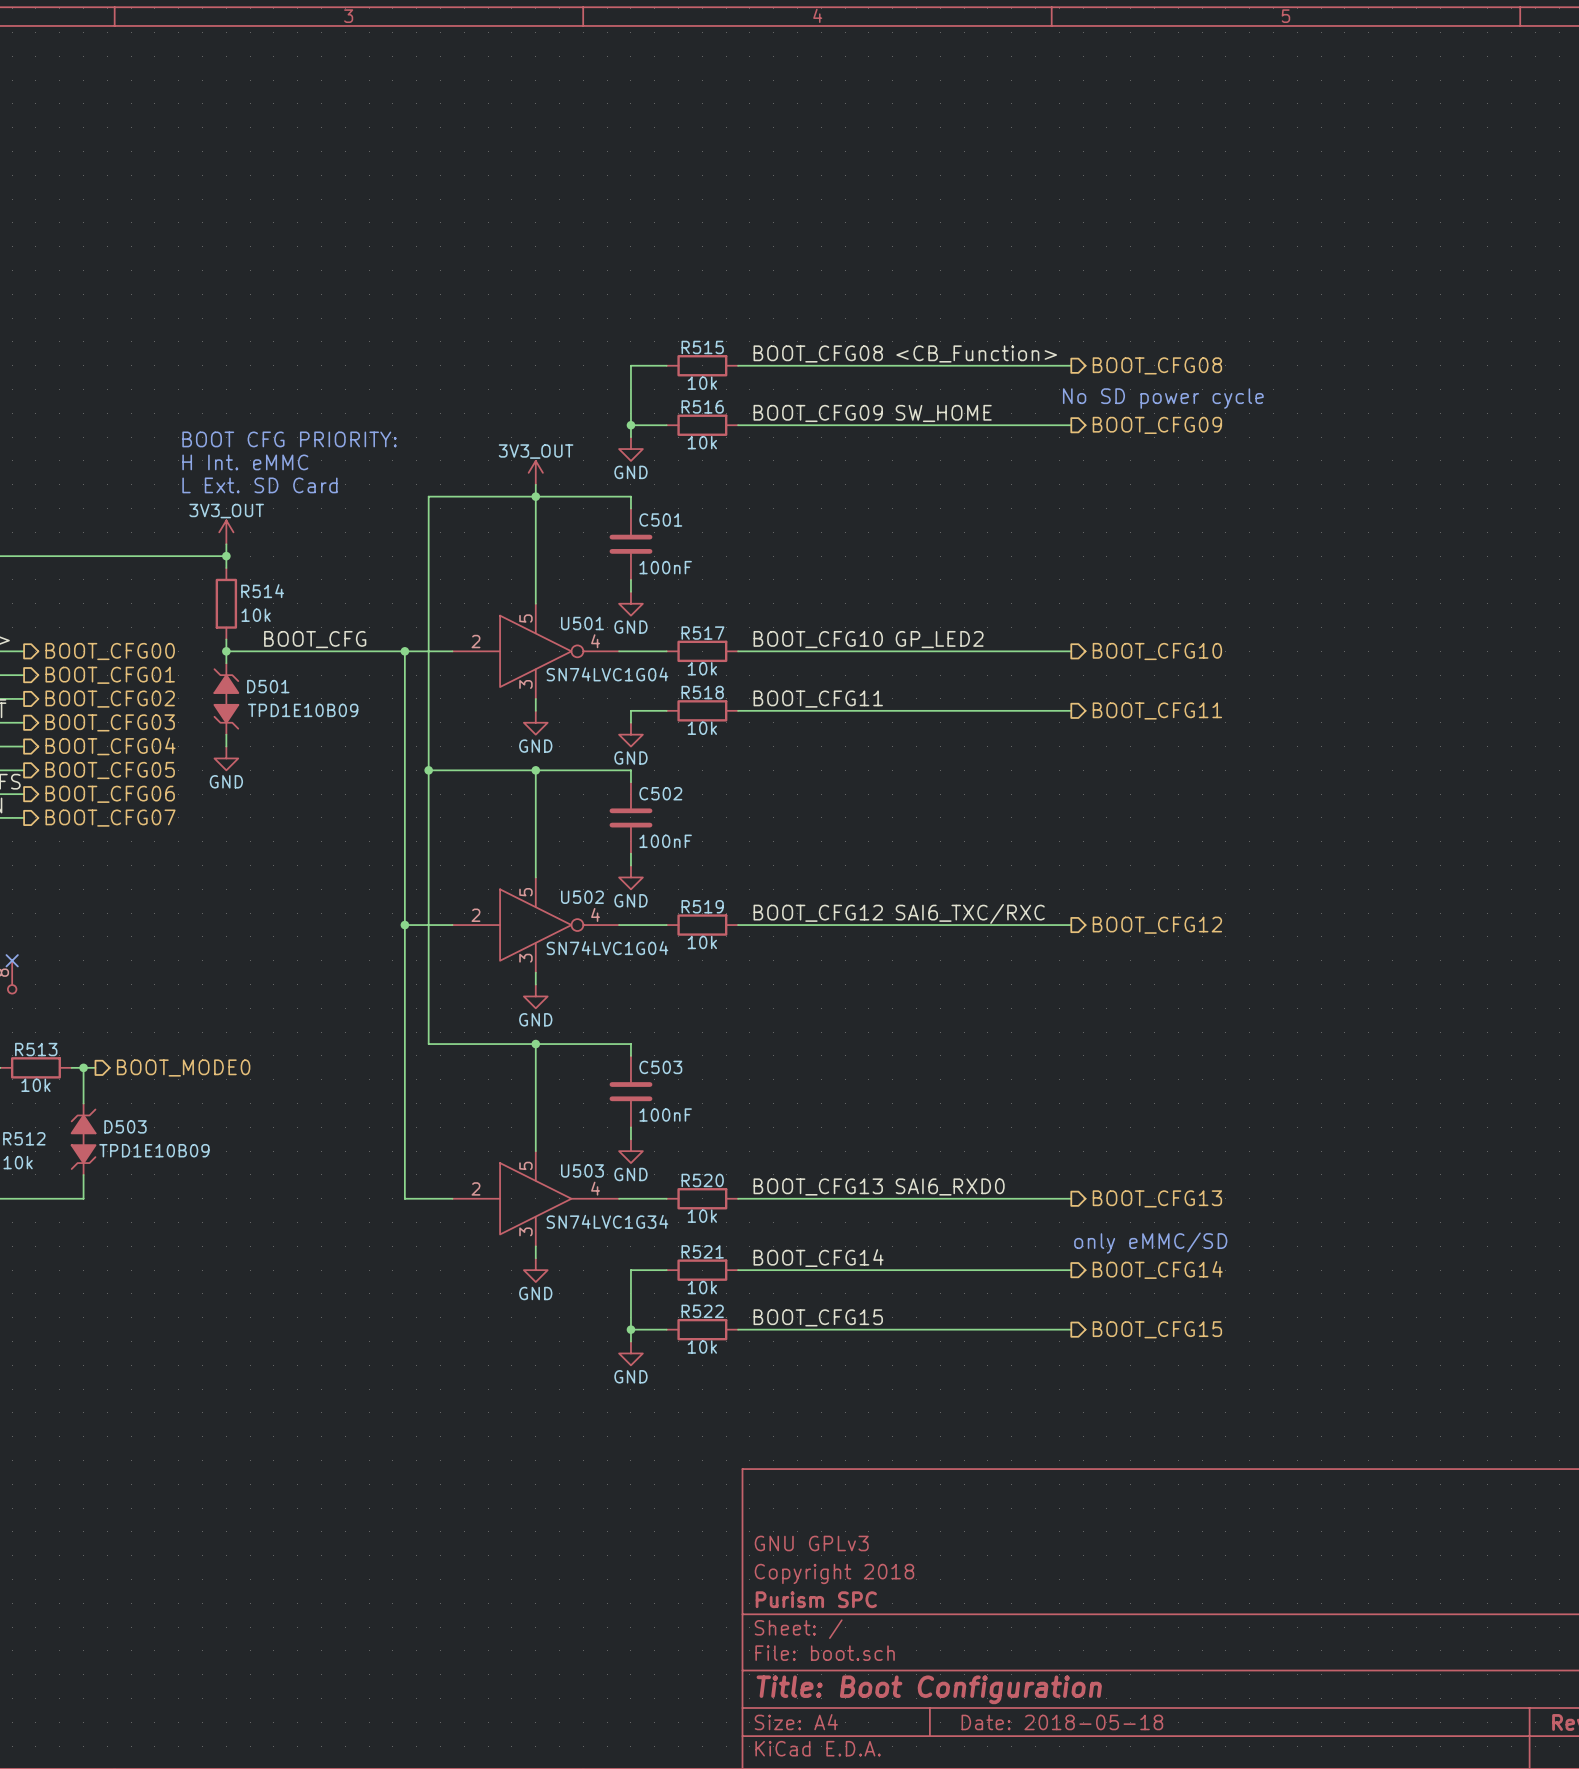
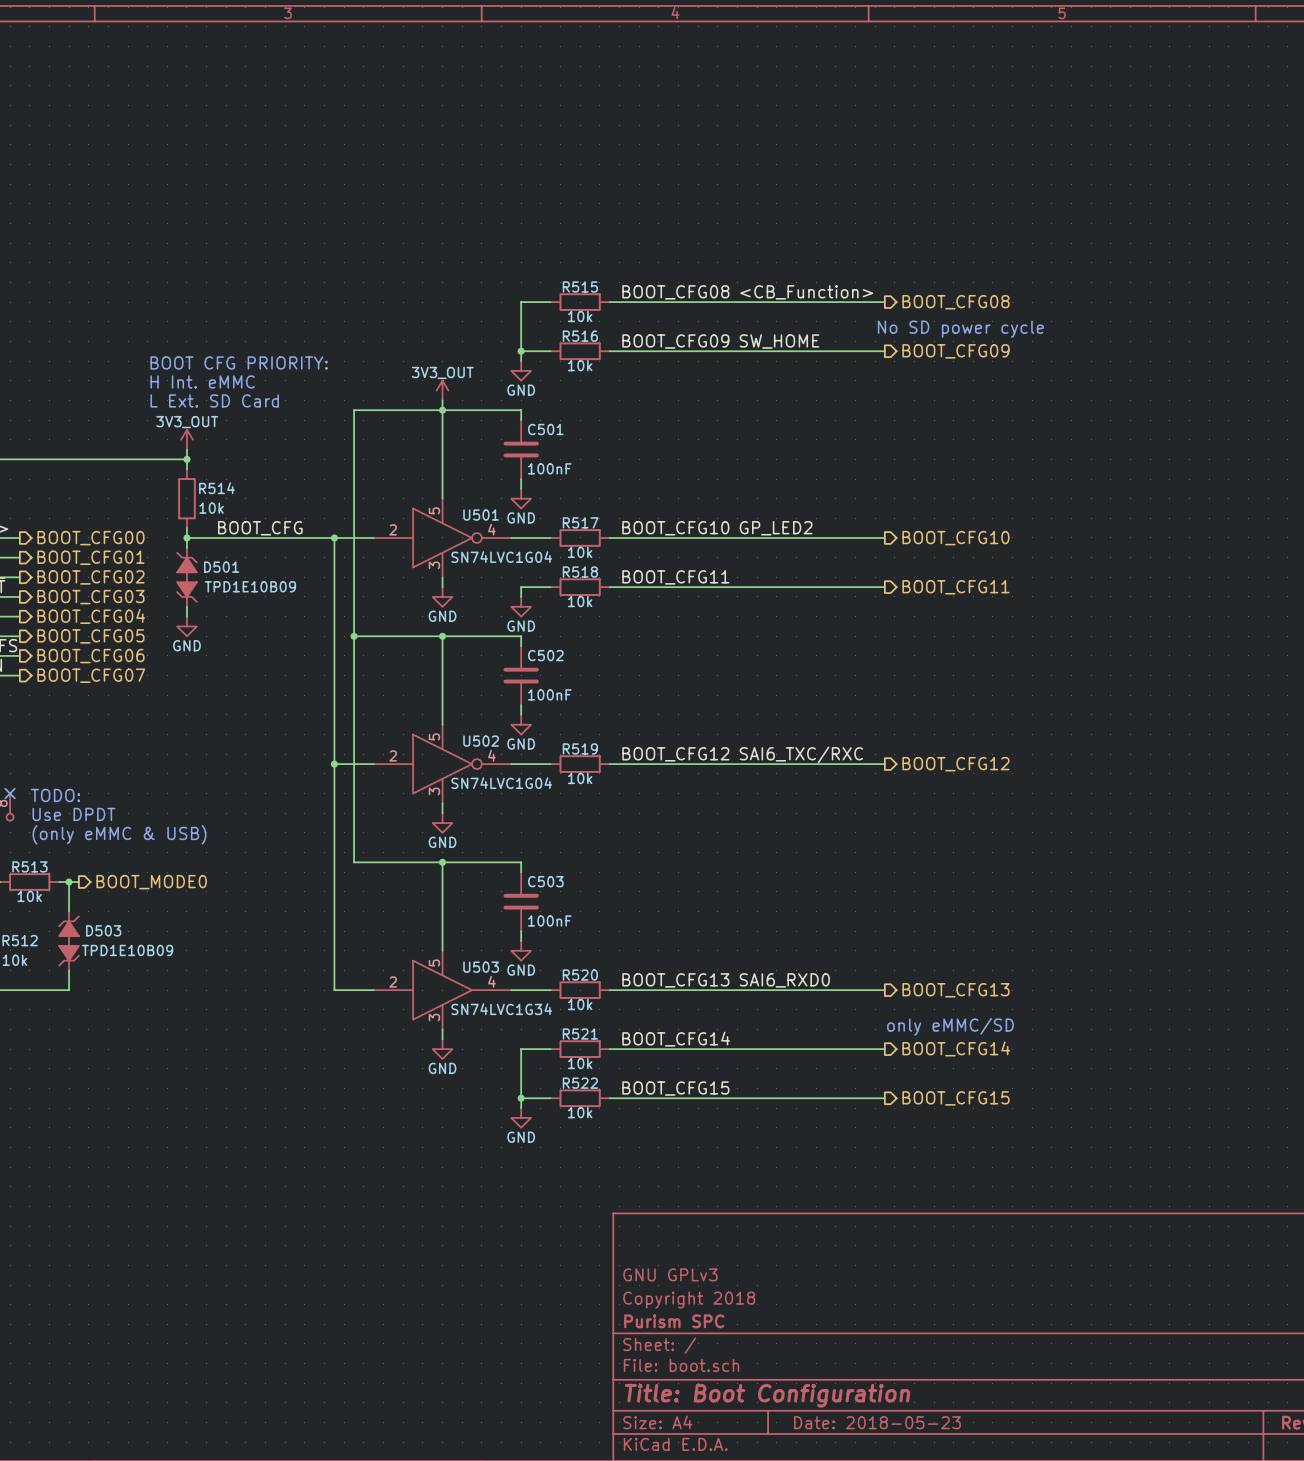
text: none -> TODO: (55, 795)
text: none -> Use DPDT (74, 814)
text: none -> (only eMMC & USB) (119, 834)
title block: Date: 2018-05-18 (1062, 1722) -> Date: 2018-05-23 (877, 1422)

